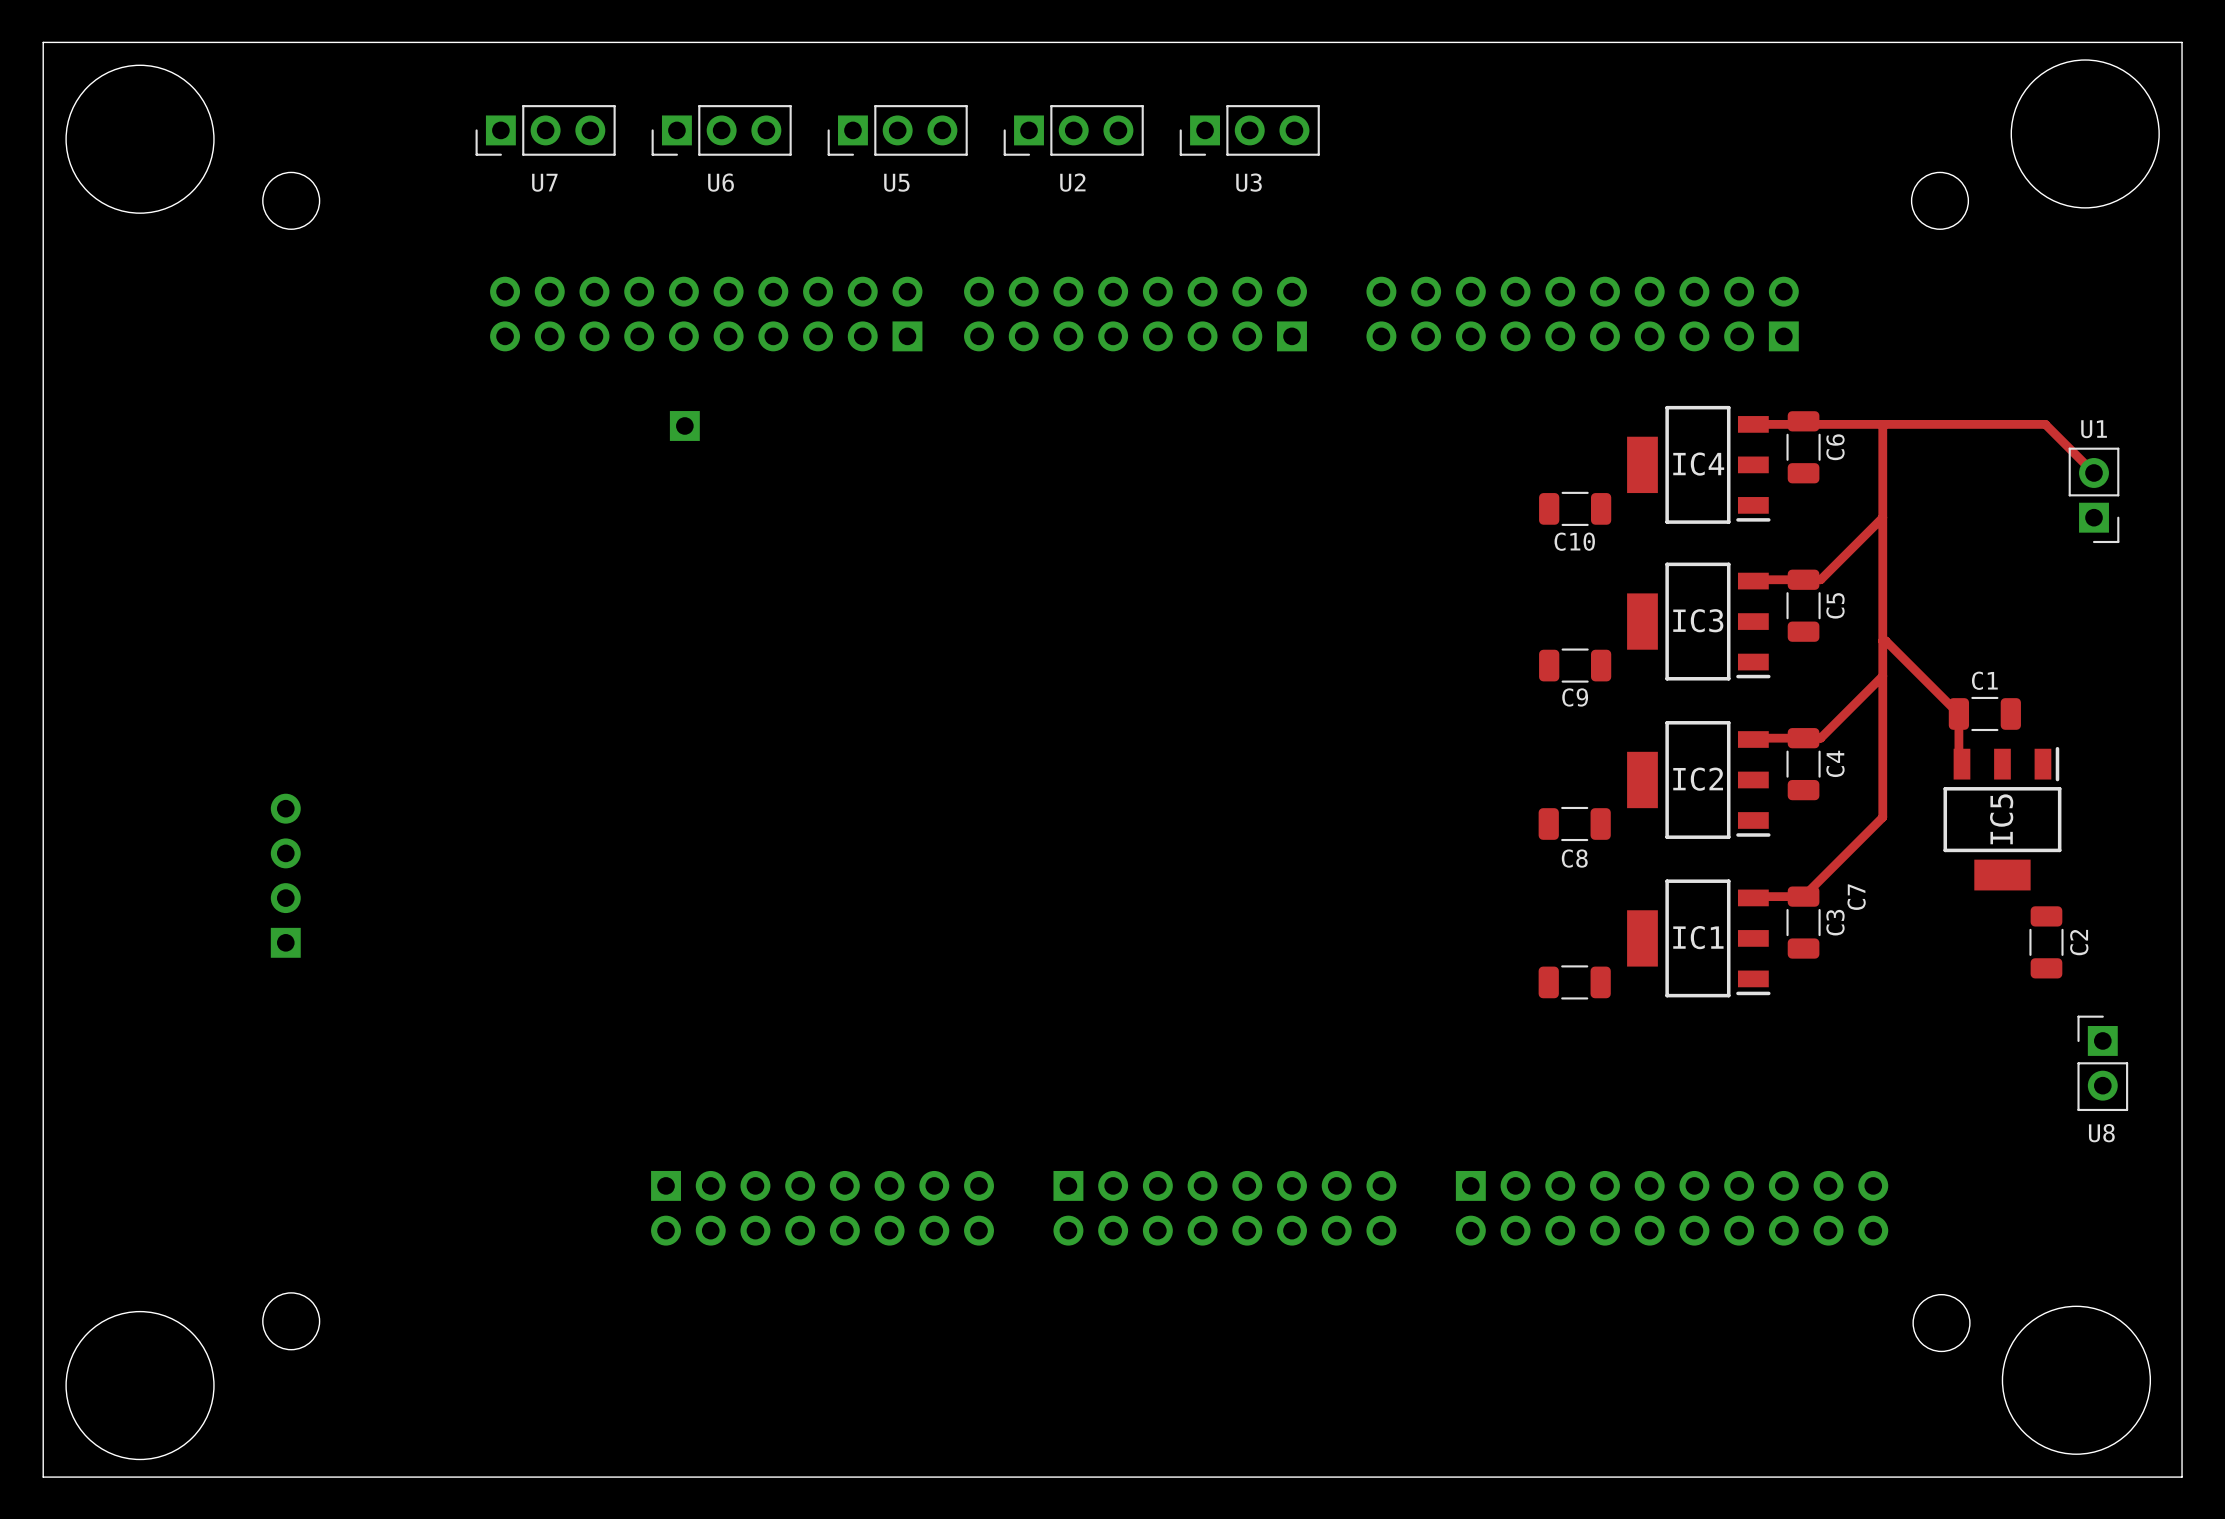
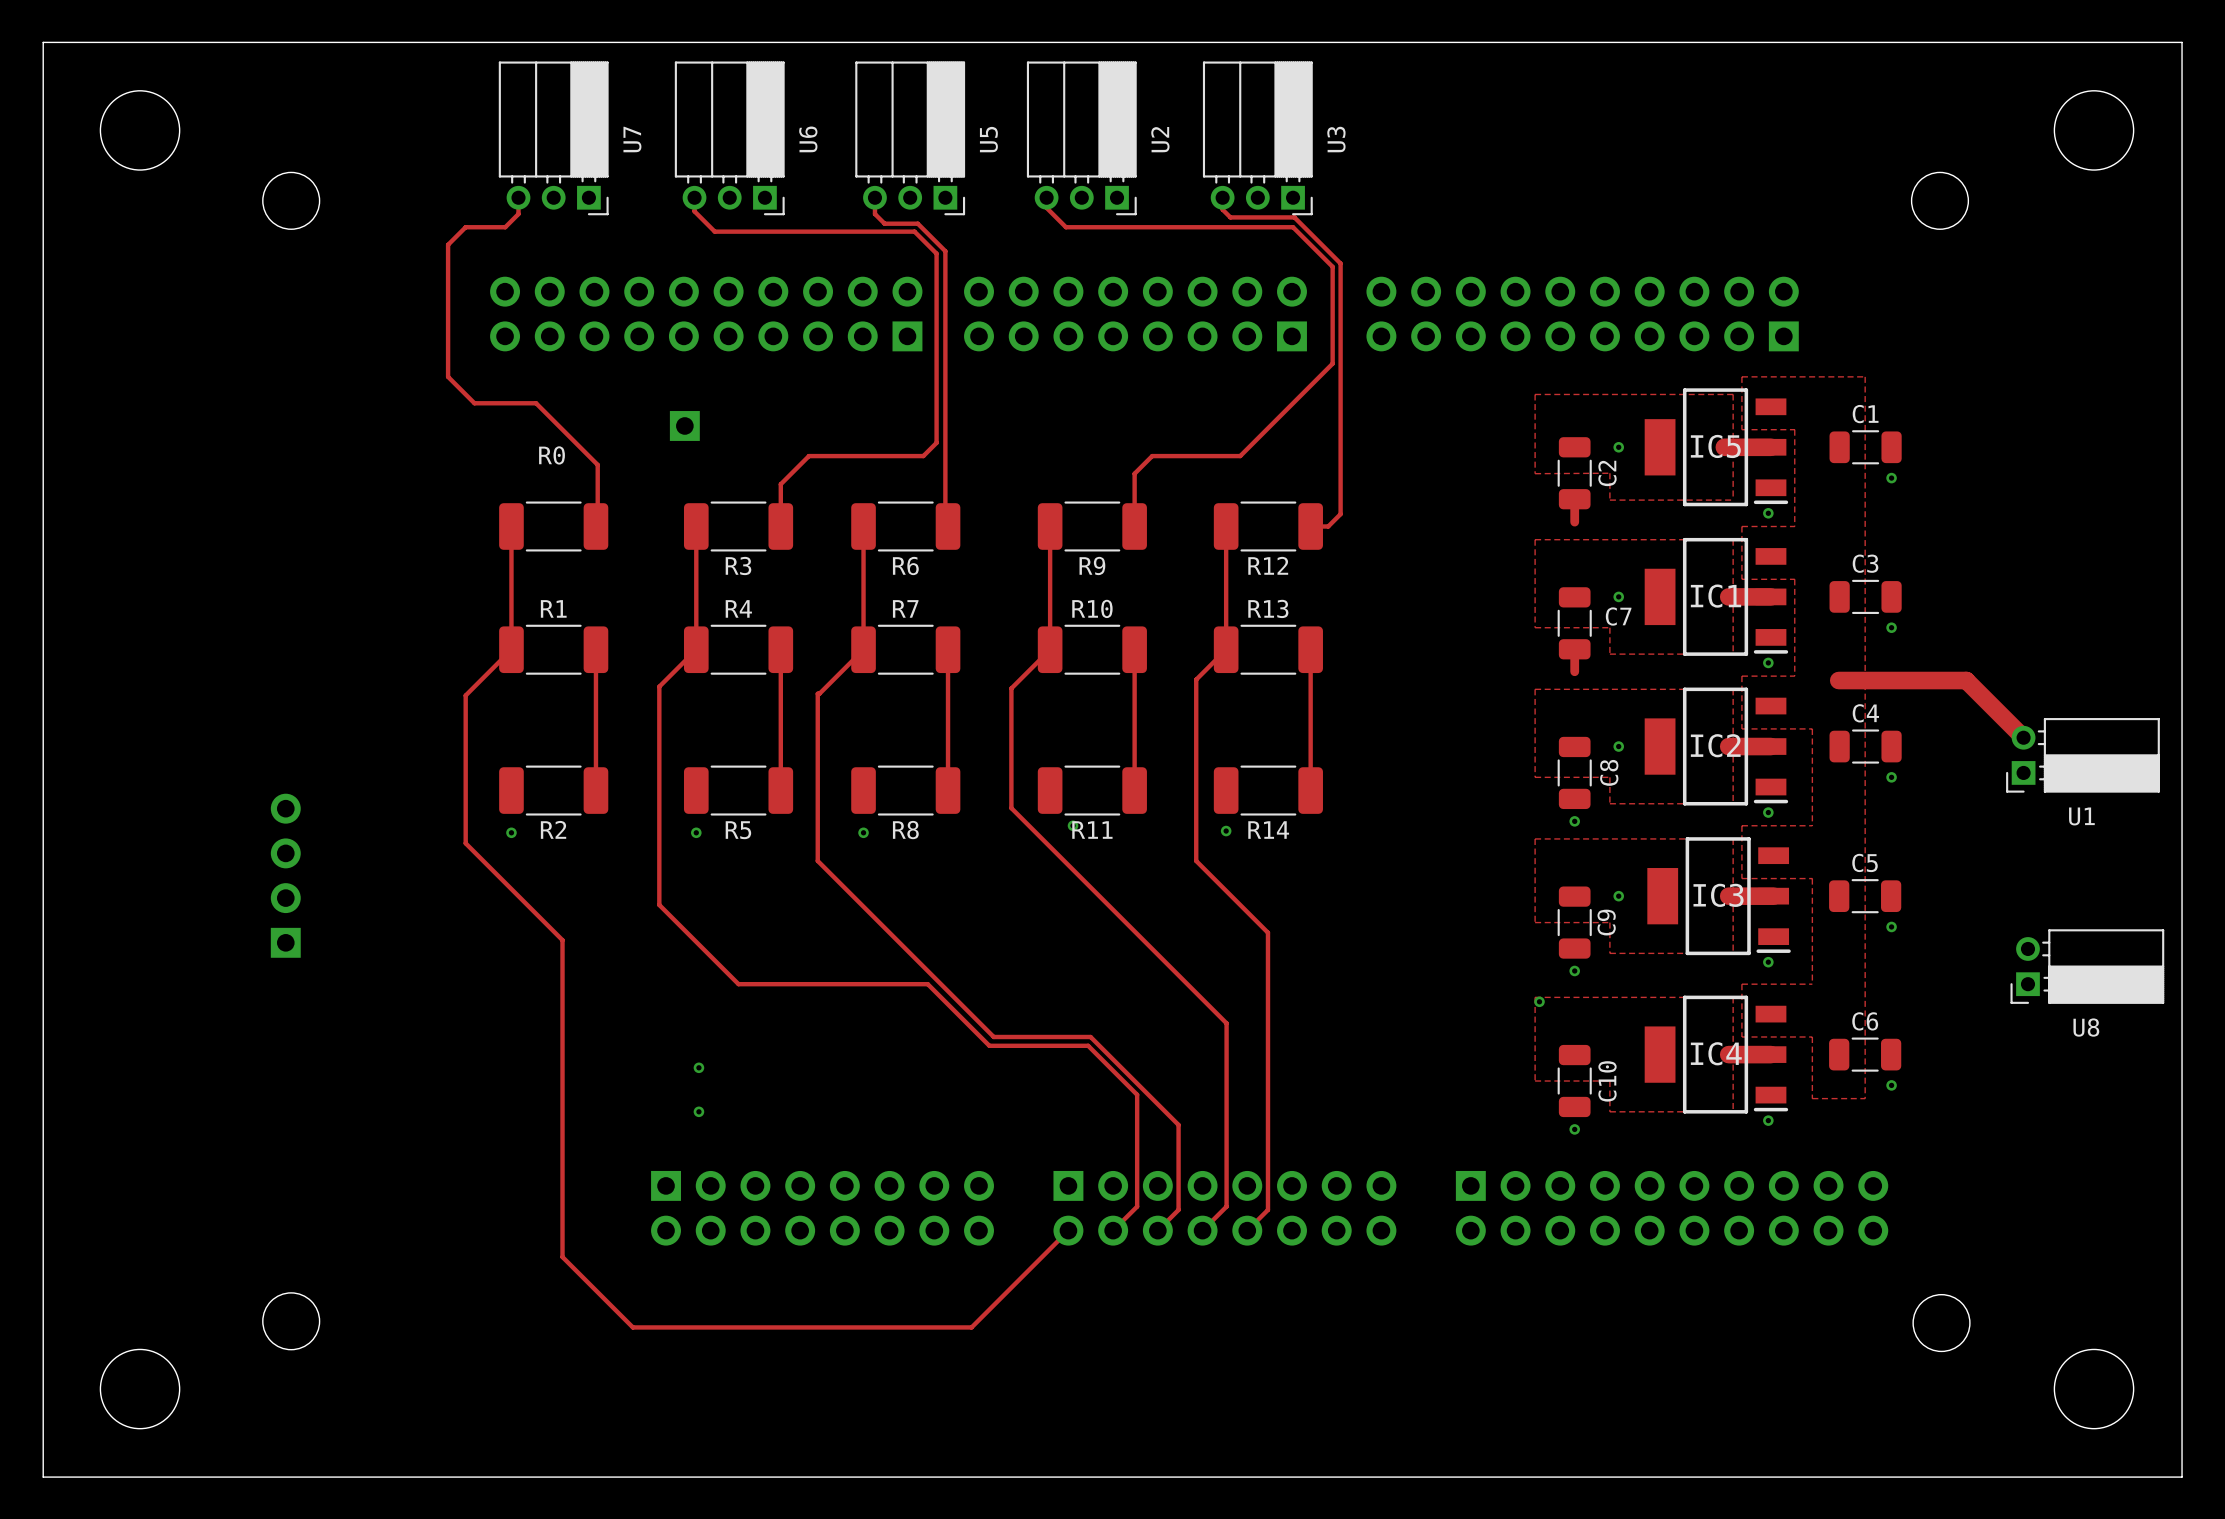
round board edge size: [2010, 59, 2160, 209] -> [2053, 90, 2135, 171]
round board edge size: [65, 64, 215, 214] -> [99, 90, 181, 171]
U7 footprint: [475, 105, 616, 156] -> [498, 61, 609, 216]
U6 footprint: [651, 105, 792, 156] -> [674, 61, 785, 216]
U5 footprint: [827, 105, 968, 156] -> [855, 61, 966, 216]
U2 footprint: [1003, 105, 1144, 156] -> [1026, 61, 1137, 216]
U3 footprint: [1179, 105, 1320, 156] -> [1202, 61, 1313, 216]
U7 name position: U7 (544, 182) -> U7 (632, 139)
U6 name position: U6 (721, 182) -> U6 (808, 139)
U5 name position: U5 (896, 182) -> U5 (988, 139)
U2 name position: U2 (1072, 182) -> U2 (1160, 139)
U3 name position: U3 (1249, 182) -> U3 (1336, 139)
track: none -> (518, 197) (518, 214) (505, 227) (465, 227) (448, 244) (448, 376) (474, 403) (536, 403) (597, 464) (597, 524) (595, 526)
track: none -> (694, 197) (694, 211) (714, 231) (914, 231) (936, 253) (936, 442) (923, 456) (808, 456) (780, 484) (780, 526)
track: none -> (874, 197) (874, 214) (884, 223) (917, 223) (945, 251) (945, 523) (948, 526)
track: none -> (1046, 197) (1046, 207) (1065, 227) (1293, 227) (1332, 266) (1332, 363) (1240, 456) (1152, 456) (1134, 473) (1134, 526)
track: none -> (1222, 197) (1222, 209) (1230, 217) (1294, 217) (1340, 263) (1340, 514) (1328, 526) (1310, 526)
zone outline: none -> (1741, 376) (1741, 429) (1794, 429) (1794, 526) (1741, 526) (1741, 579) (1794, 579) (1794, 676) (1741, 676) (1741, 728) (1812, 728) (1812, 825) (1741, 825) (1741, 878) (1812, 878) (1812, 984) (1741, 984) (1741, 1036) (1812, 1036) (1812, 1098) (1865, 1098) (1865, 376) (1741, 376)
zone outline: none -> (1535, 394) (1733, 394) (1733, 500) (1609, 500) (1609, 473) (1535, 473) (1535, 394)
track: (1753, 424) (2045, 424) (2094, 472) -> none
track: (1882, 424) (1882, 817) (1803, 896) (1753, 897) -> none
U1 name position: U1 (2094, 429) -> U1 (2081, 816)
via: none -> (1618, 447)
track: none -> (1724, 447) (1770, 447)
C6 rotation: 0° (1803, 447) -> 90° clockwise (1865, 1054)
C6 position: (1803, 447) -> (1865, 1054)
C6 name position: C6 (1835, 447) -> C6 (1865, 1021)
U1 footprint: [2068, 447, 2120, 544] -> [2006, 718, 2160, 793]
IC4 position: (1698, 464) -> (1716, 1054)
via: none -> (1891, 478)
track: none -> (1574, 499) (1574, 522)
C10 rotation: 0° (1575, 508) -> 90° clockwise (1574, 1081)
C10 position: (1575, 508) -> (1574, 1081)
via: none -> (1768, 513)
track: (1882, 517) (1820, 579) (1753, 581) -> none
track: none -> (511, 526) (511, 649) (465, 695) (465, 843) (562, 940) (562, 1257) (632, 1327) (971, 1327) (1068, 1230)
R0: none -> (553, 526)
track: none -> (696, 526) (696, 649) (659, 686) (659, 904) (738, 984) (927, 984) (989, 1045) (1088, 1045) (1137, 1094) (1137, 1206) (1113, 1230)
R3: none -> (738, 526)
track: none -> (863, 526) (863, 649) (817, 693) (817, 860) (993, 1036) (1090, 1036) (1178, 1124) (1178, 1209) (1157, 1230)
R6: none -> (905, 526)
track: none -> (1050, 526) (1050, 649) (1011, 688) (1011, 808) (1226, 1023) (1226, 1206) (1202, 1230)
R9: none -> (1092, 526)
track: none -> (1226, 526) (1226, 649) (1196, 679) (1196, 860) (1267, 932) (1267, 1209) (1247, 1230)
R12: none -> (1268, 526)
zone outline: none -> (1535, 539) (1535, 627) (1609, 627) (1609, 654) (1733, 654) (1733, 539) (1535, 539)
C10 name position: C10 (1574, 541) -> C10 (1607, 1081)
via: none -> (1618, 596)
track: none -> (1728, 596) (1770, 596)
C5 rotation: 0° (1803, 605) -> 90° clockwise (1865, 896)
C5 position: (1803, 605) -> (1865, 896)
C5 name position: C5 (1835, 605) -> C5 (1865, 862)
IC3 position: (1698, 621) -> (1719, 896)
via: none -> (1891, 627)
track: (1882, 640) (1885, 640) (1958, 713) (1958, 761) (1961, 764) -> none
R1: none -> (553, 649)
track: none -> (595, 649) (595, 790)
R4: none -> (738, 649)
track: none -> (780, 649) (780, 790)
R7: none -> (905, 649)
track: none -> (948, 649) (948, 790)
R10: none -> (1092, 649)
track: none -> (1134, 649) (1134, 790)
R13: none -> (1268, 649)
track: none -> (1310, 649) (1310, 790)
track: none -> (1574, 649) (1574, 671)
via: none -> (1768, 662)
C9 rotation: 0° (1575, 665) -> 90° clockwise (1574, 922)
C9 position: (1575, 665) -> (1574, 922)
track: (1882, 676) (1820, 738) (1753, 739) -> none
track: none -> (1838, 680) (1966, 680) (2023, 737)
zone outline: none -> (1535, 689) (1535, 777) (1609, 777) (1609, 803) (1733, 803) (1733, 689) (1535, 689)
C9 name position: C9 (1575, 697) -> C9 (1606, 922)
C1 position: (1984, 713) -> (1865, 447)
via: none -> (1618, 746)
track: none -> (1728, 746) (1770, 746)
C4 name position: C4 (1835, 763) -> C4 (1865, 713)
C4 rotation: 0° (1803, 764) -> 90° clockwise (1865, 746)
C4 position: (1803, 764) -> (1865, 746)
via: none -> (1891, 777)
IC2 position: (1698, 779) -> (1716, 746)
R2: none -> (553, 790)
R5: none -> (738, 790)
R8: none -> (905, 790)
R11: none -> (1092, 790)
R14: none -> (1268, 790)
via: none -> (1768, 812)
IC5 rotation: 0° (2002, 818) -> 90° clockwise (1716, 447)
IC5 position: (2002, 818) -> (1716, 447)
via: none -> (1574, 821)
C8 rotation: 0° (1574, 823) -> 90° clockwise (1574, 772)
C8 position: (1574, 823) -> (1574, 772)
via: none -> (1073, 825)
via: none -> (1226, 831)
via: none -> (511, 832)
via: none -> (696, 832)
via: none -> (863, 832)
zone outline: none -> (1535, 838) (1535, 922) (1609, 922) (1609, 953) (1733, 953) (1733, 838) (1535, 838)
C8 name position: C8 (1574, 858) -> C8 (1609, 772)
via: none -> (1618, 896)
track: none -> (1728, 896) (1773, 896)
C7 name position: C7 (1856, 897) -> C7 (1618, 616)
C3 rotation: 0° (1803, 922) -> 90° clockwise (1865, 596)
C3 position: (1803, 922) -> (1865, 596)
C3 name position: C3 (1835, 922) -> C3 (1865, 563)
via: none -> (1891, 926)
IC1 position: (1698, 938) -> (1716, 596)
C2 position: (2046, 942) -> (1574, 473)
via: none -> (1768, 962)
via: none -> (1574, 970)
C7 rotation: 0° (1574, 982) -> 90° clockwise (1574, 623)
C7 position: (1574, 982) -> (1574, 623)
zone outline: none -> (1535, 997) (1535, 1081) (1609, 1081) (1609, 1111) (1733, 1111) (1733, 997) (1535, 997)
via: none -> (1539, 1001)
U8 footprint: [2077, 1015, 2129, 1112] -> [2010, 929, 2165, 1004]
track: none -> (1728, 1054) (1770, 1054)
via: none -> (698, 1067)
via: none -> (1891, 1085)
via: none -> (698, 1111)
via: none -> (1768, 1120)
via: none -> (1574, 1129)
round board edge: [2002, 1305, 2151, 1455] -> none
round board edge size: [65, 1311, 215, 1460] -> [99, 1349, 181, 1430]
round board edge: none -> [2053, 1349, 2135, 1430]

